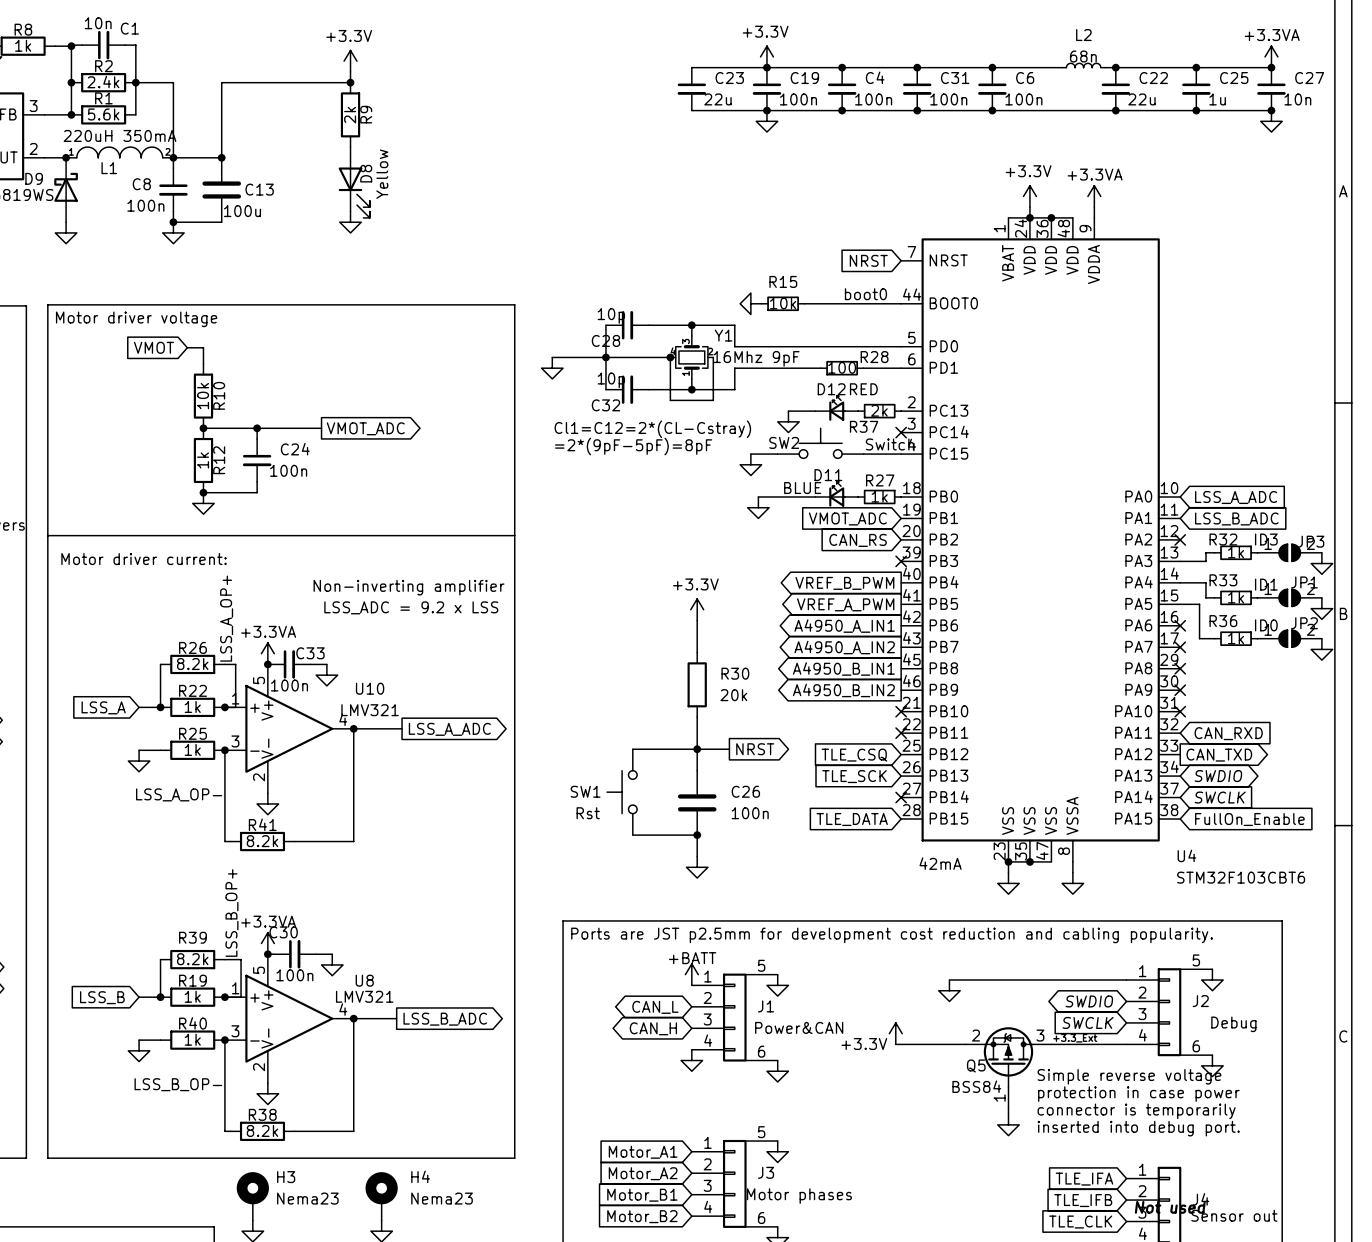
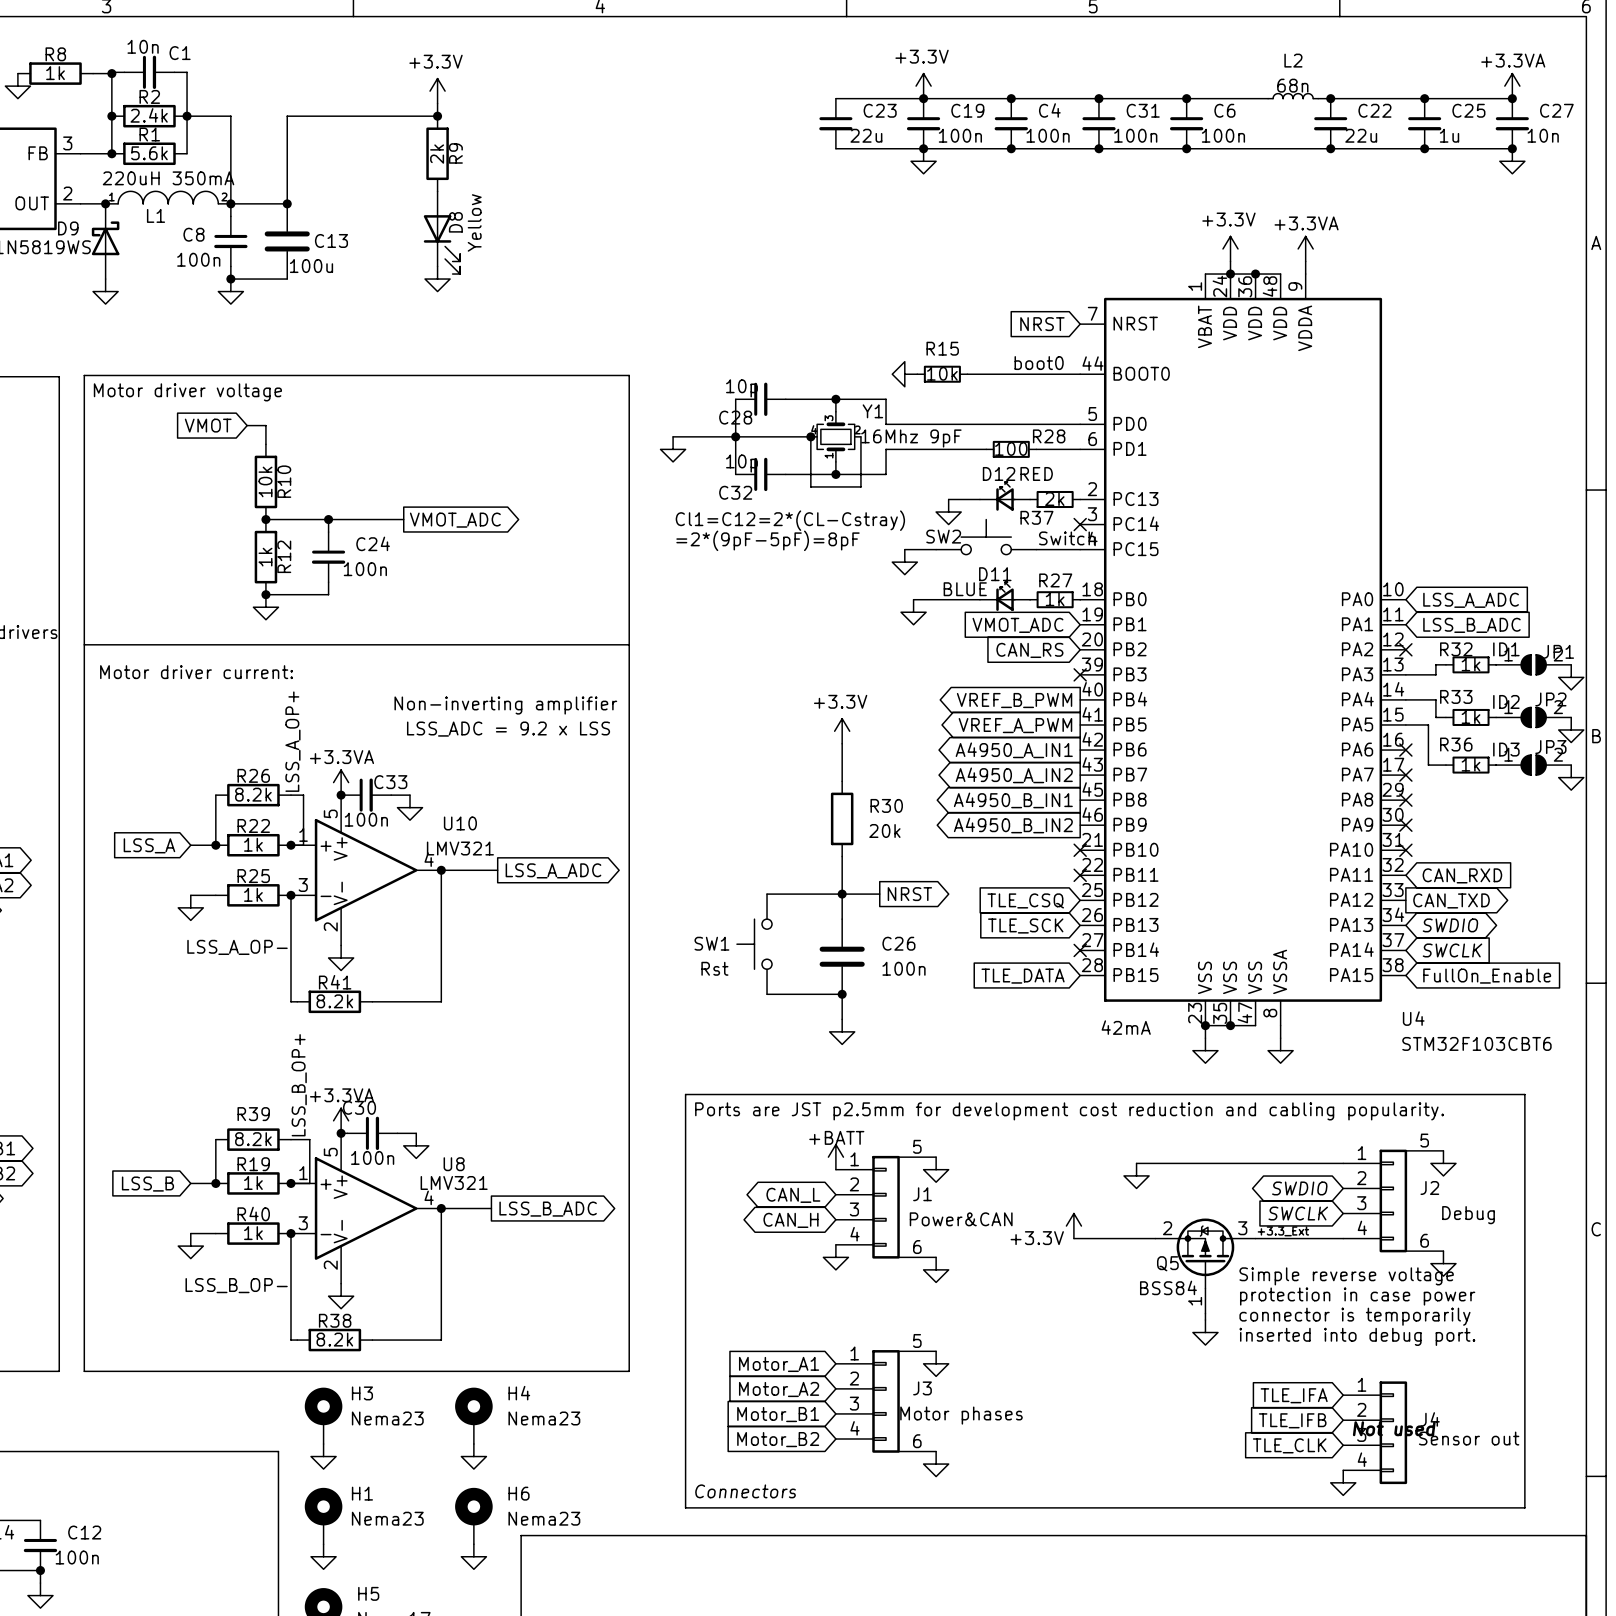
JP3 value: ID3 (1266, 539) -> ID1 (1506, 649)
JP3 name: JP3 (1310, 541) -> JP1 (1558, 651)
JP1 name: JP1 (1304, 582) -> JP2 (1550, 699)
JP1 value: ID1 (1266, 584) -> ID2 (1506, 701)
JP2 name: JP2 (1304, 623) -> JP3 (1550, 747)
JP2 value: ID0 (1266, 625) -> ID3 (1506, 749)

